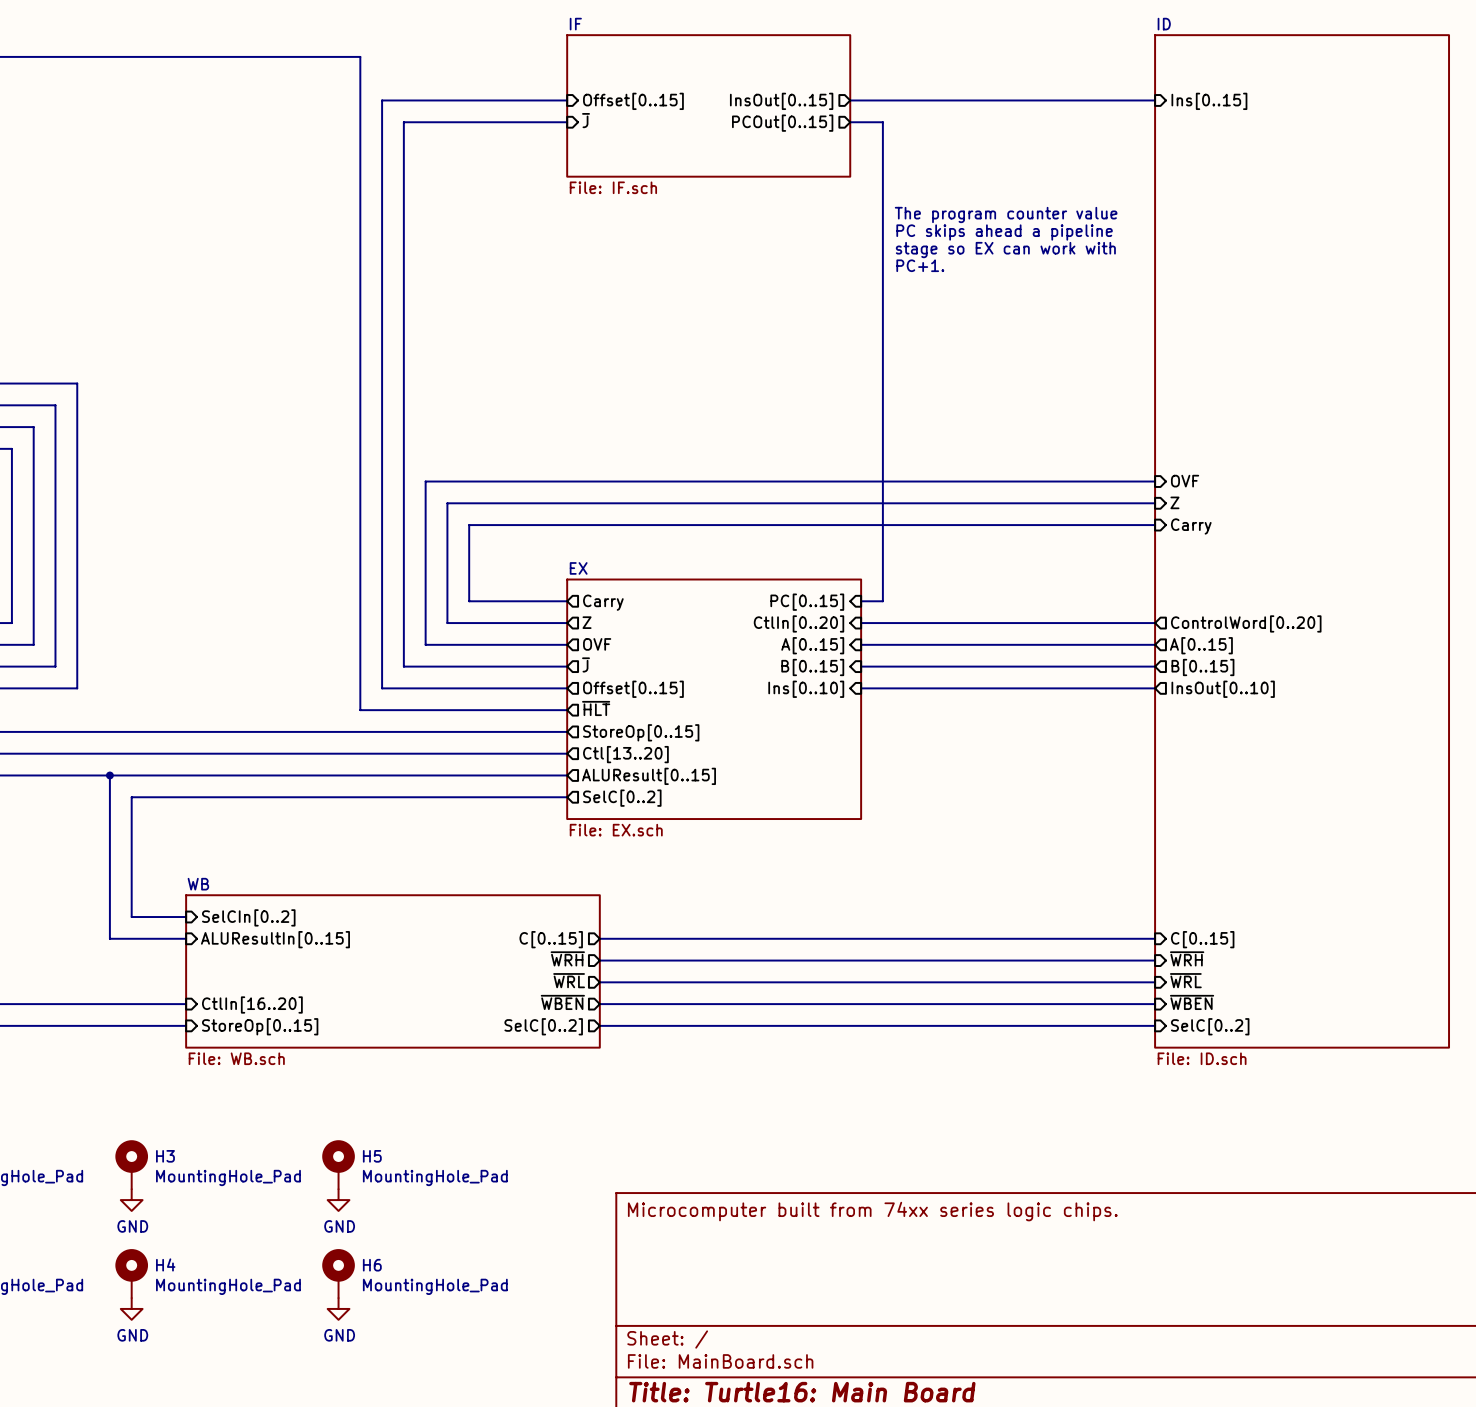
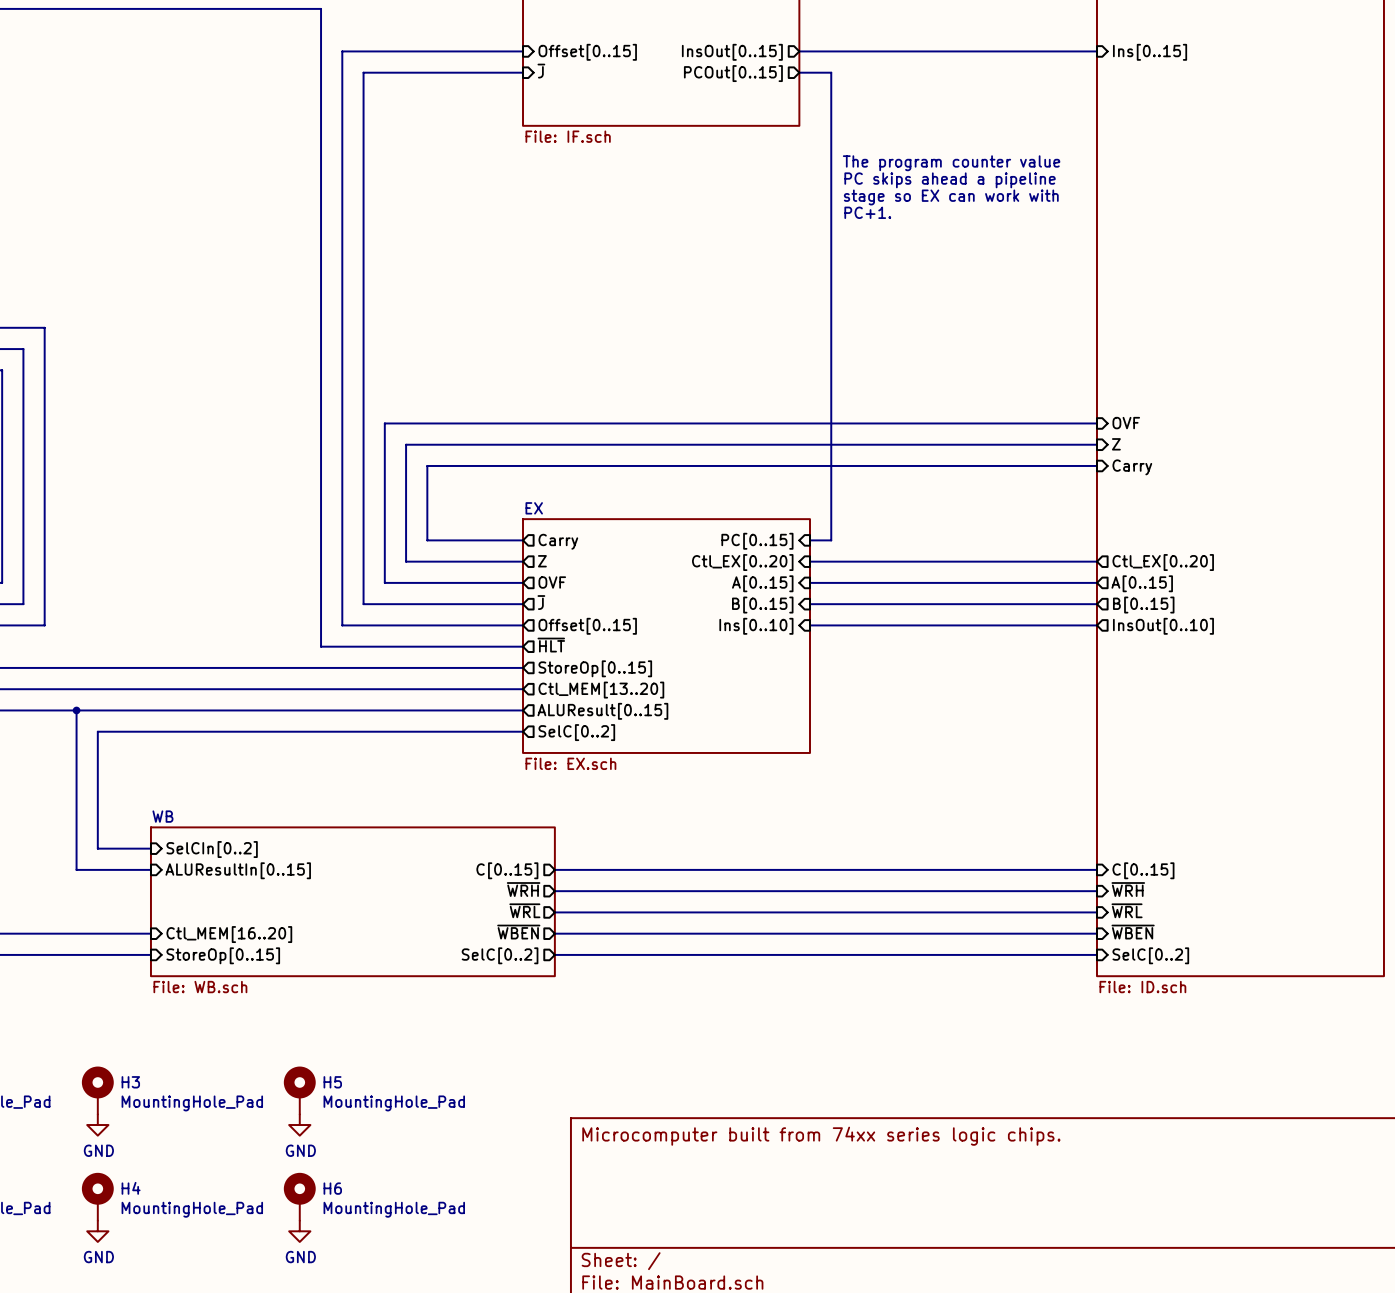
sheet pin: CtlIn[0..20] (799, 623) -> Ctl_EX[0..20] (742, 562)
sheet pin: ControlWord[0..20] (1246, 623) -> Ctl_EX[0..20] (1163, 562)
sheet pin: Ctl[13..20] (625, 754) -> Ctl_MEM[13..20] (601, 690)
sheet pin: CtlIn[16..20] (252, 1004) -> Ctl_MEM[16..20] (229, 934)

